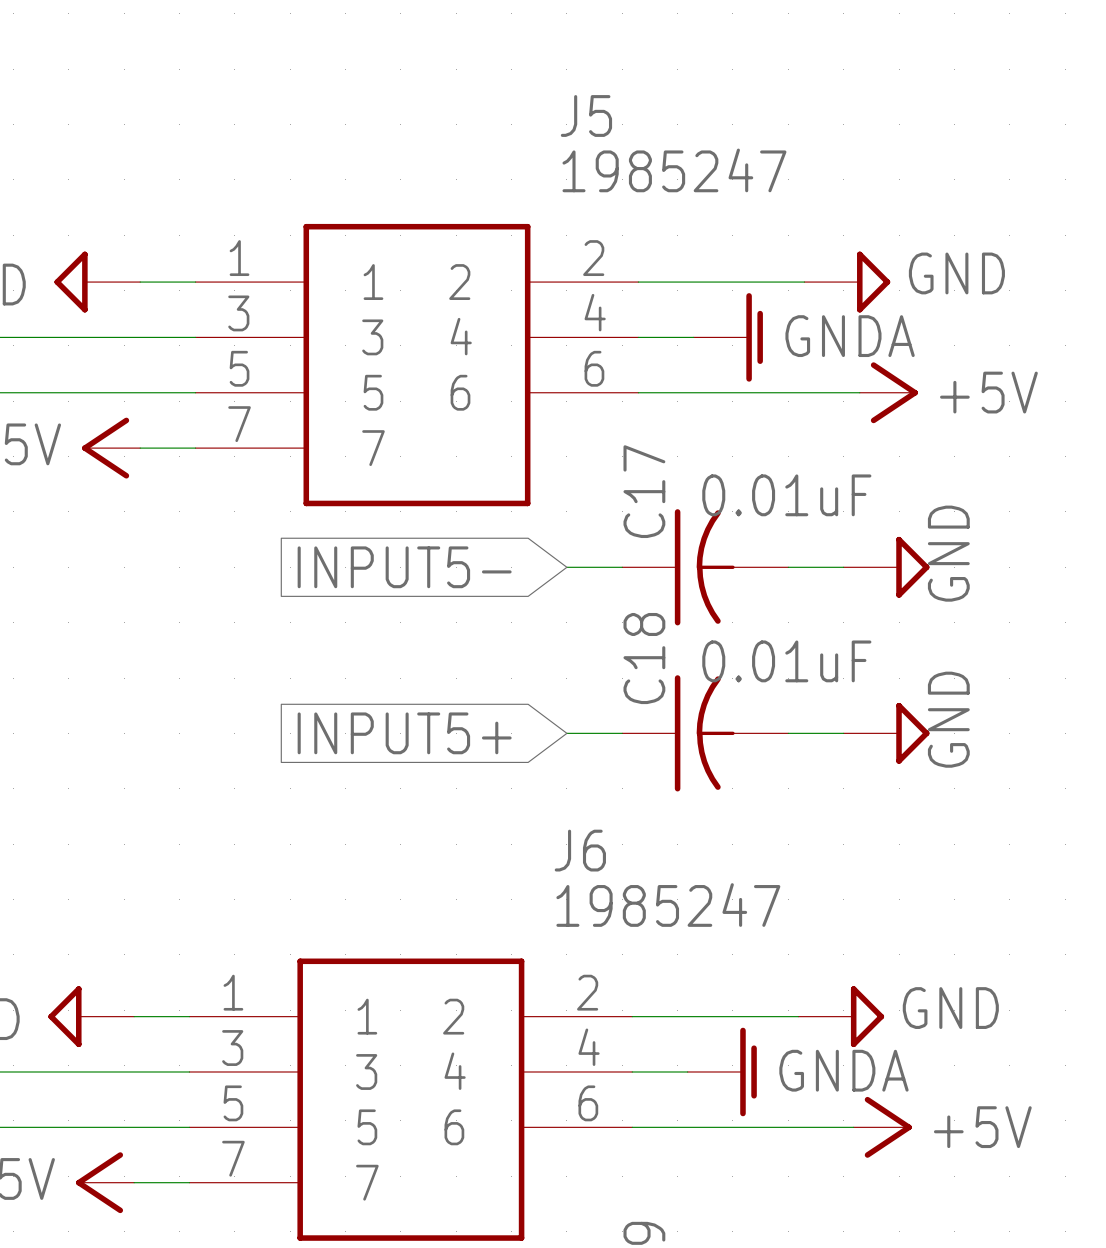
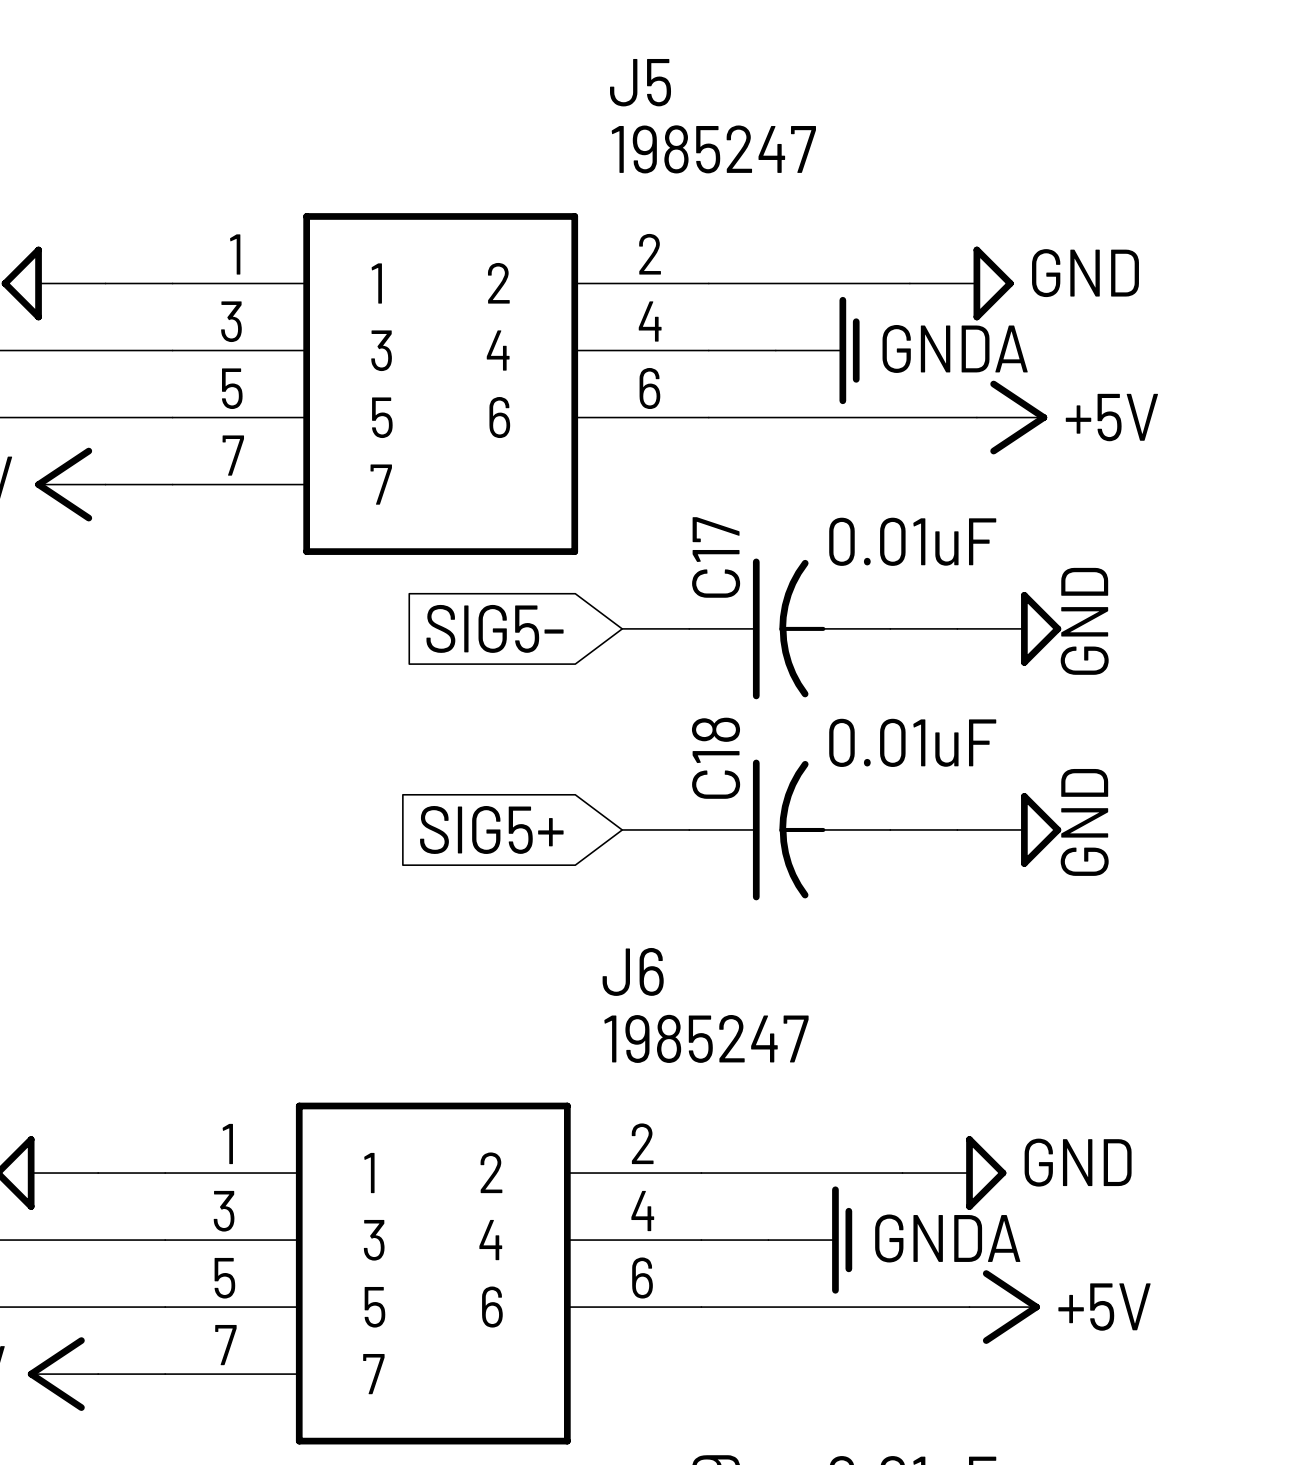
global label: INPUT5- (404, 567) -> SIG5- (495, 628)
global label: INPUT5+ (404, 733) -> SIG5+ (491, 829)

